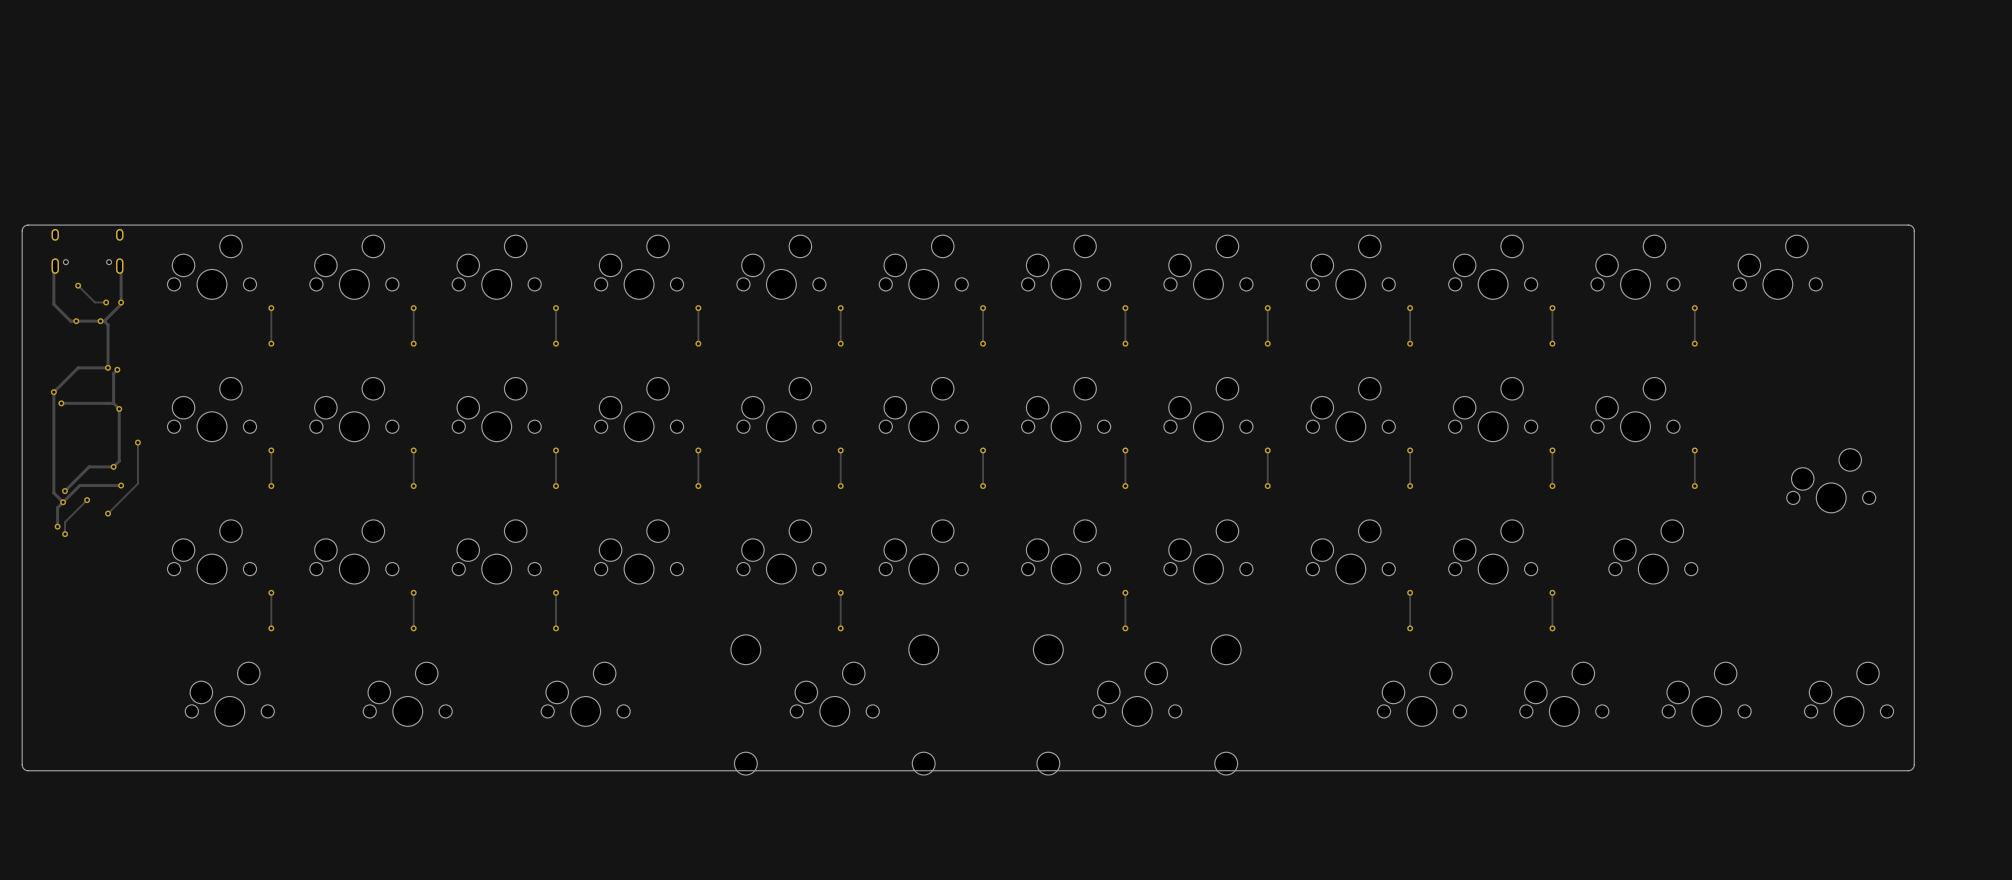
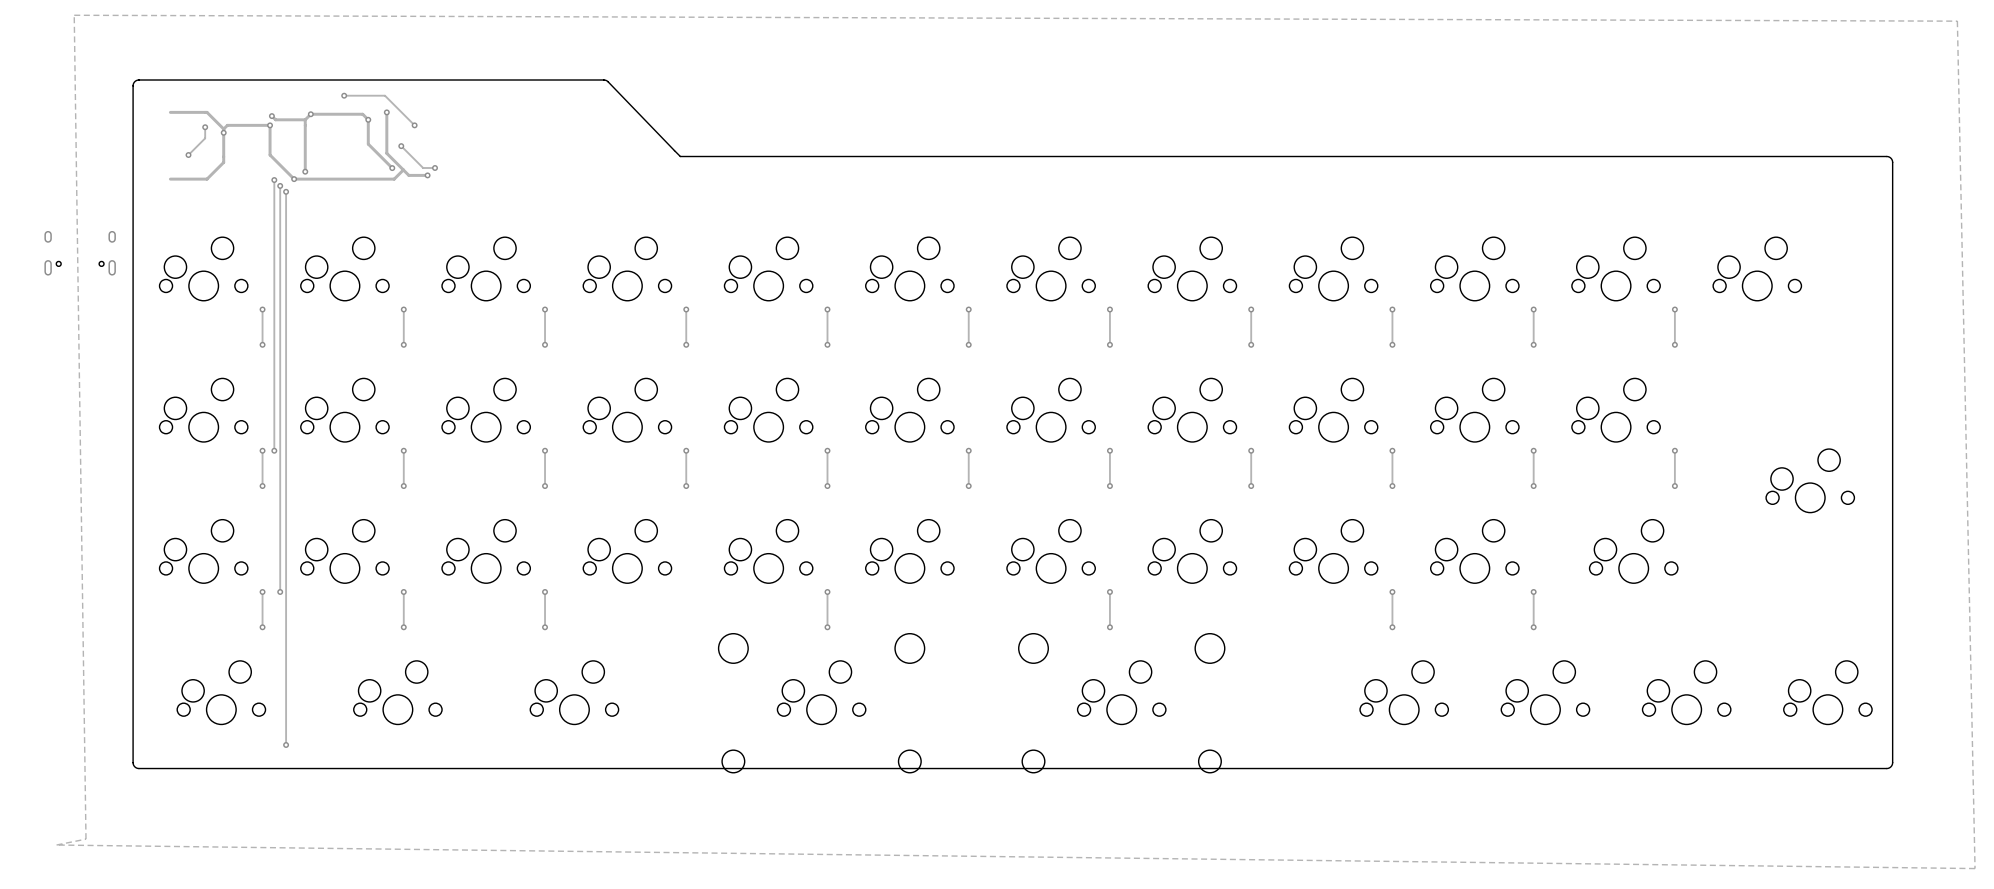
zone outline: none -> (74, 15) (1957, 21) (1975, 868) (56, 845) (86, 839) (74, 15)
track: none -> (344, 95) (384, 95) (414, 125)
via: none -> (344, 95)
track: none -> (170, 112) (207, 112) (223, 129)
track: none -> (386, 112) (386, 153) (408, 175) (427, 175)
via: none -> (386, 112)
via: none -> (310, 114)
track: none -> (271, 116) (275, 119) (305, 119)
via: none -> (271, 116)
track: none -> (305, 119) (310, 114) (362, 114) (368, 119) (368, 144) (392, 168)
track: none -> (305, 119) (305, 171)
via: none -> (368, 119)
via: none -> (270, 125)
via: none -> (414, 125)
track: none -> (205, 127) (205, 138) (188, 155)
via: none -> (205, 127)
track: none -> (223, 129) (227, 125) (270, 125) (270, 155) (294, 179) (394, 179) (403, 169)
track: none -> (223, 129) (223, 162) (207, 179) (170, 179)
via: none -> (223, 132)
track: none -> (401, 146) (423, 167) (435, 167)
via: none -> (401, 146)
via: none -> (188, 155)
via: none -> (392, 168)
via: none -> (435, 167)
via: none -> (305, 171)
via: none -> (427, 175)
via: none -> (294, 179)
track: none -> (274, 180) (274, 450)
via: none -> (274, 180)
track: none -> (280, 185) (280, 591)
via: none -> (280, 185)
track: none -> (286, 191) (286, 744)
via: none -> (286, 191)
board edge: (1914, 231) (1912, 226) (1908, 225) (26, 225) (22, 231) (22, 766) (28, 770) (146, 770) -> (1892, 233) (1892, 161) (1887, 156) (680, 156) (604, 80) (137, 80) (133, 85) (133, 762)
track: (53, 267) (53, 304) (70, 321) (104, 321) -> none
track: (121, 267) (121, 304) (104, 321) -> none
track: (78, 285) (94, 302) (106, 302) -> none
via: (78, 285) -> none
via: (106, 302) -> none
via: (121, 302) -> none
via: (76, 321) -> none
via: (100, 321) -> none
track: (104, 321) (108, 324) (108, 367) (78, 367) (53, 392) (53, 493) (63, 502) -> none
via: (108, 367) -> none
track: (117, 369) (113, 373) (113, 403) -> none
via: (117, 369) -> none
via: (53, 392) -> none
track: (61, 403) (113, 403) -> none
via: (61, 403) -> none
track: (113, 403) (119, 408) (119, 461) (113, 466) (89, 466) (64, 491) -> none
via: (119, 408) -> none
track: (137, 442) (137, 483) (108, 513) -> none
via: (137, 442) -> none
via: none -> (274, 450)
via: (113, 466) -> none
track: (121, 485) (79, 485) (57, 507) (57, 526) -> none
via: (121, 485) -> none
via: (64, 491) -> none
track: (87, 500) (65, 522) (65, 534) -> none
via: (87, 500) -> none
via: (63, 502) -> none
via: (108, 513) -> none
via: (57, 526) -> none
via: (65, 534) -> none
via: none -> (280, 591)
via: none -> (286, 744)
board edge: none -> (133, 762) (134, 766) (138, 768)

